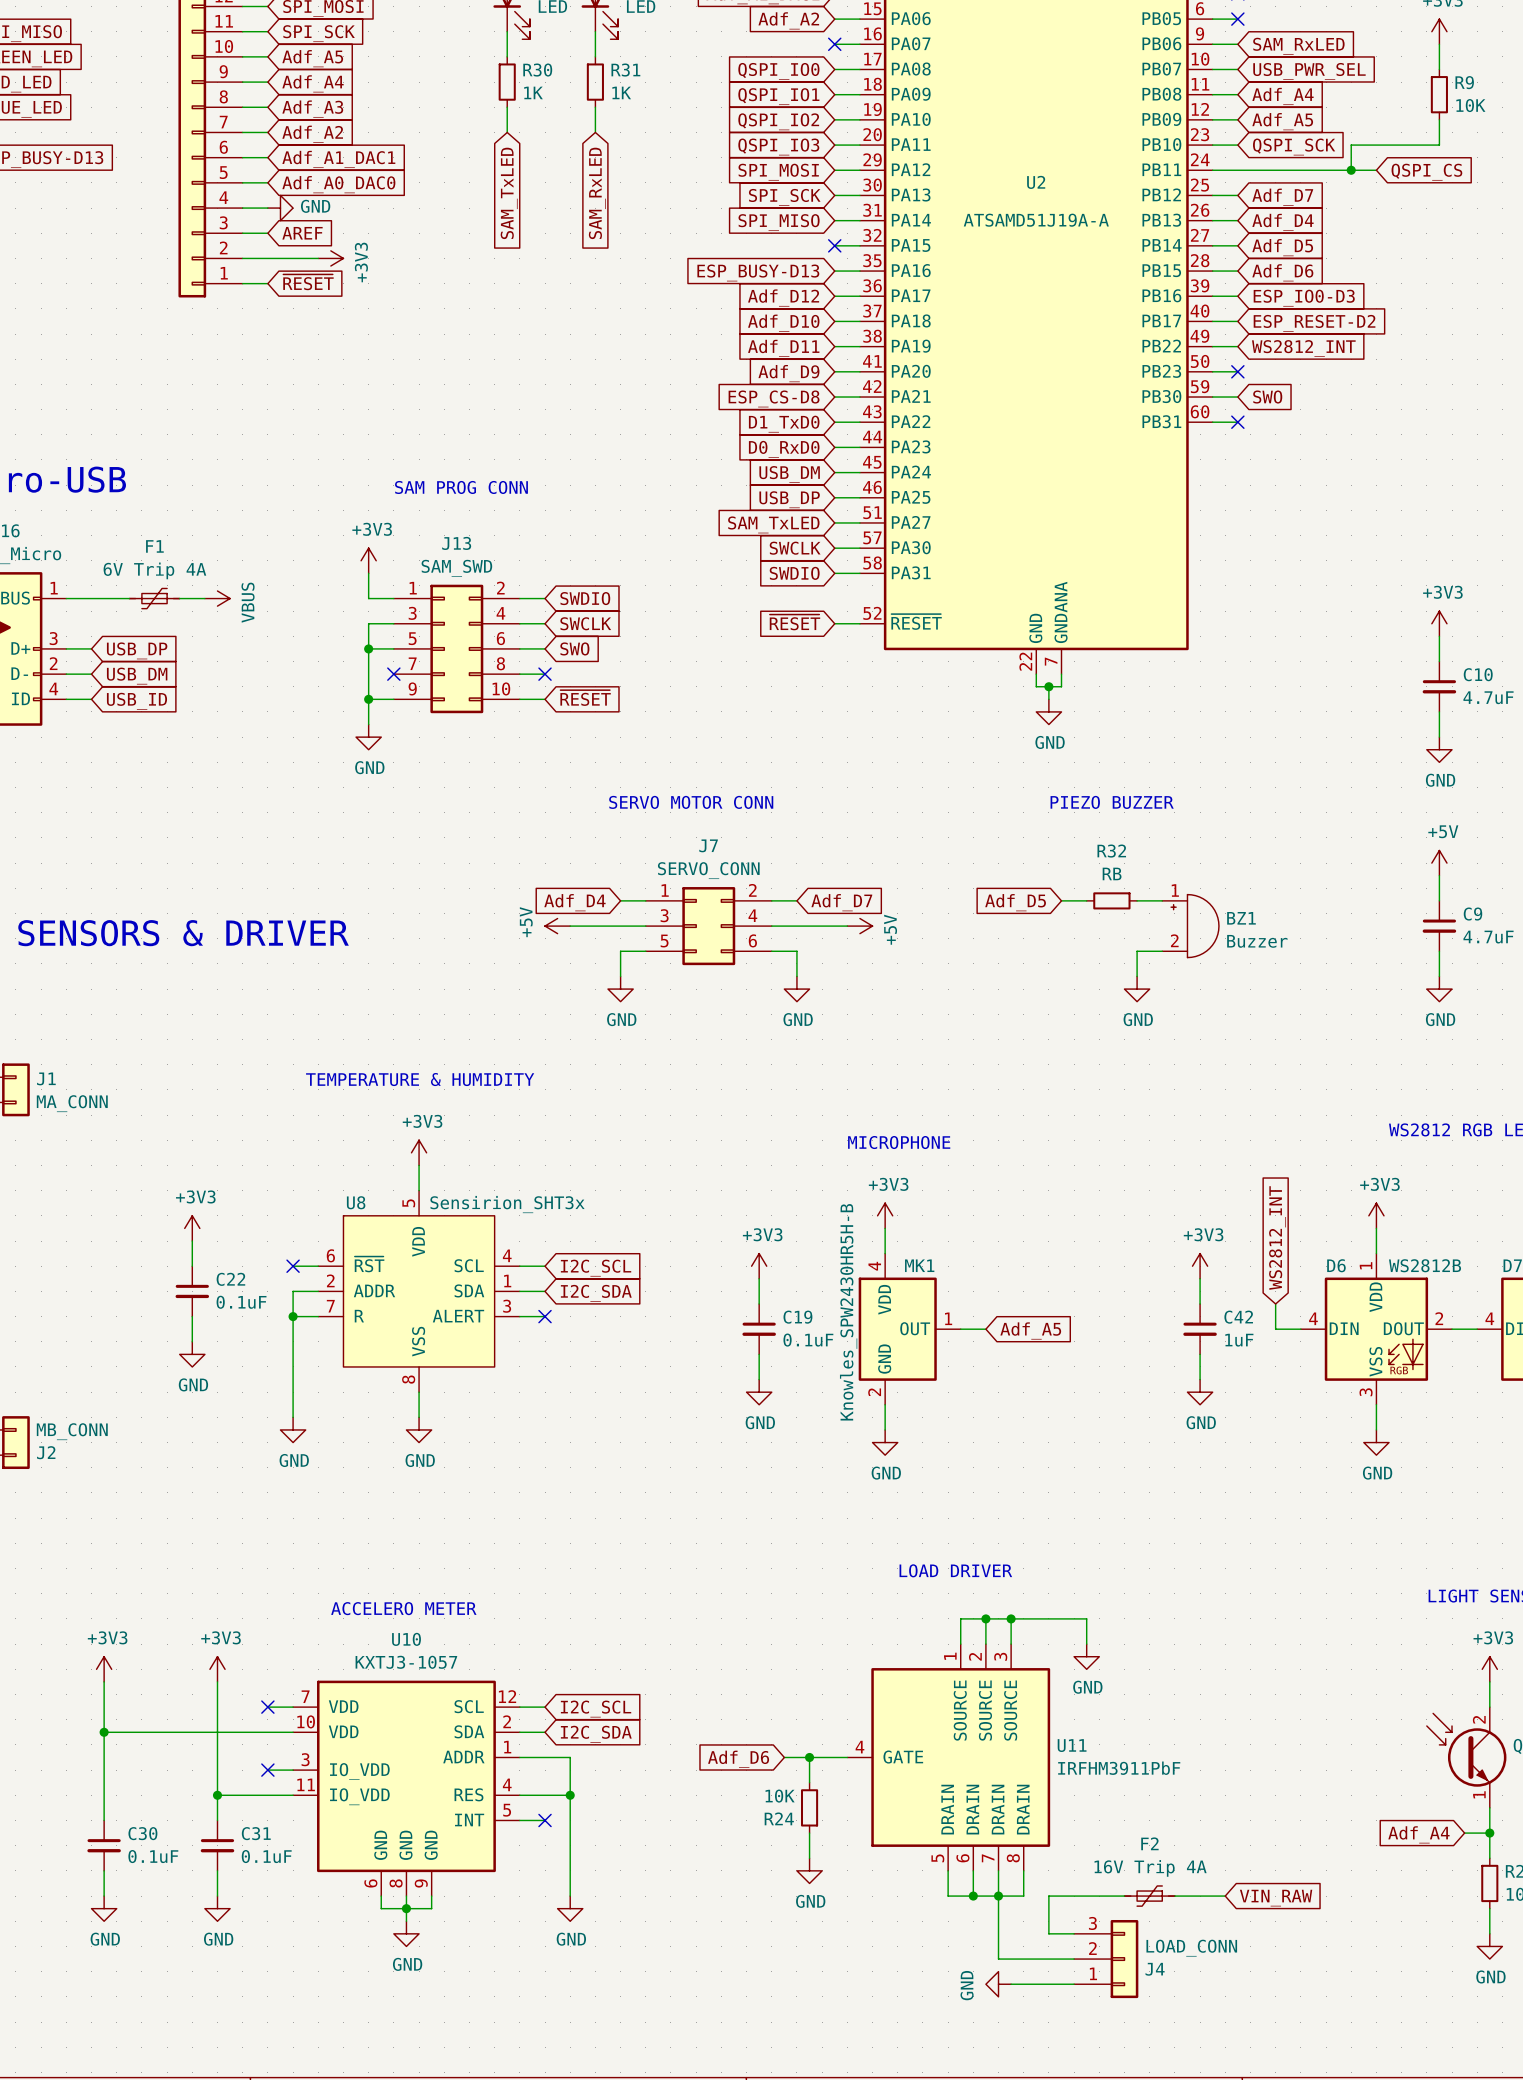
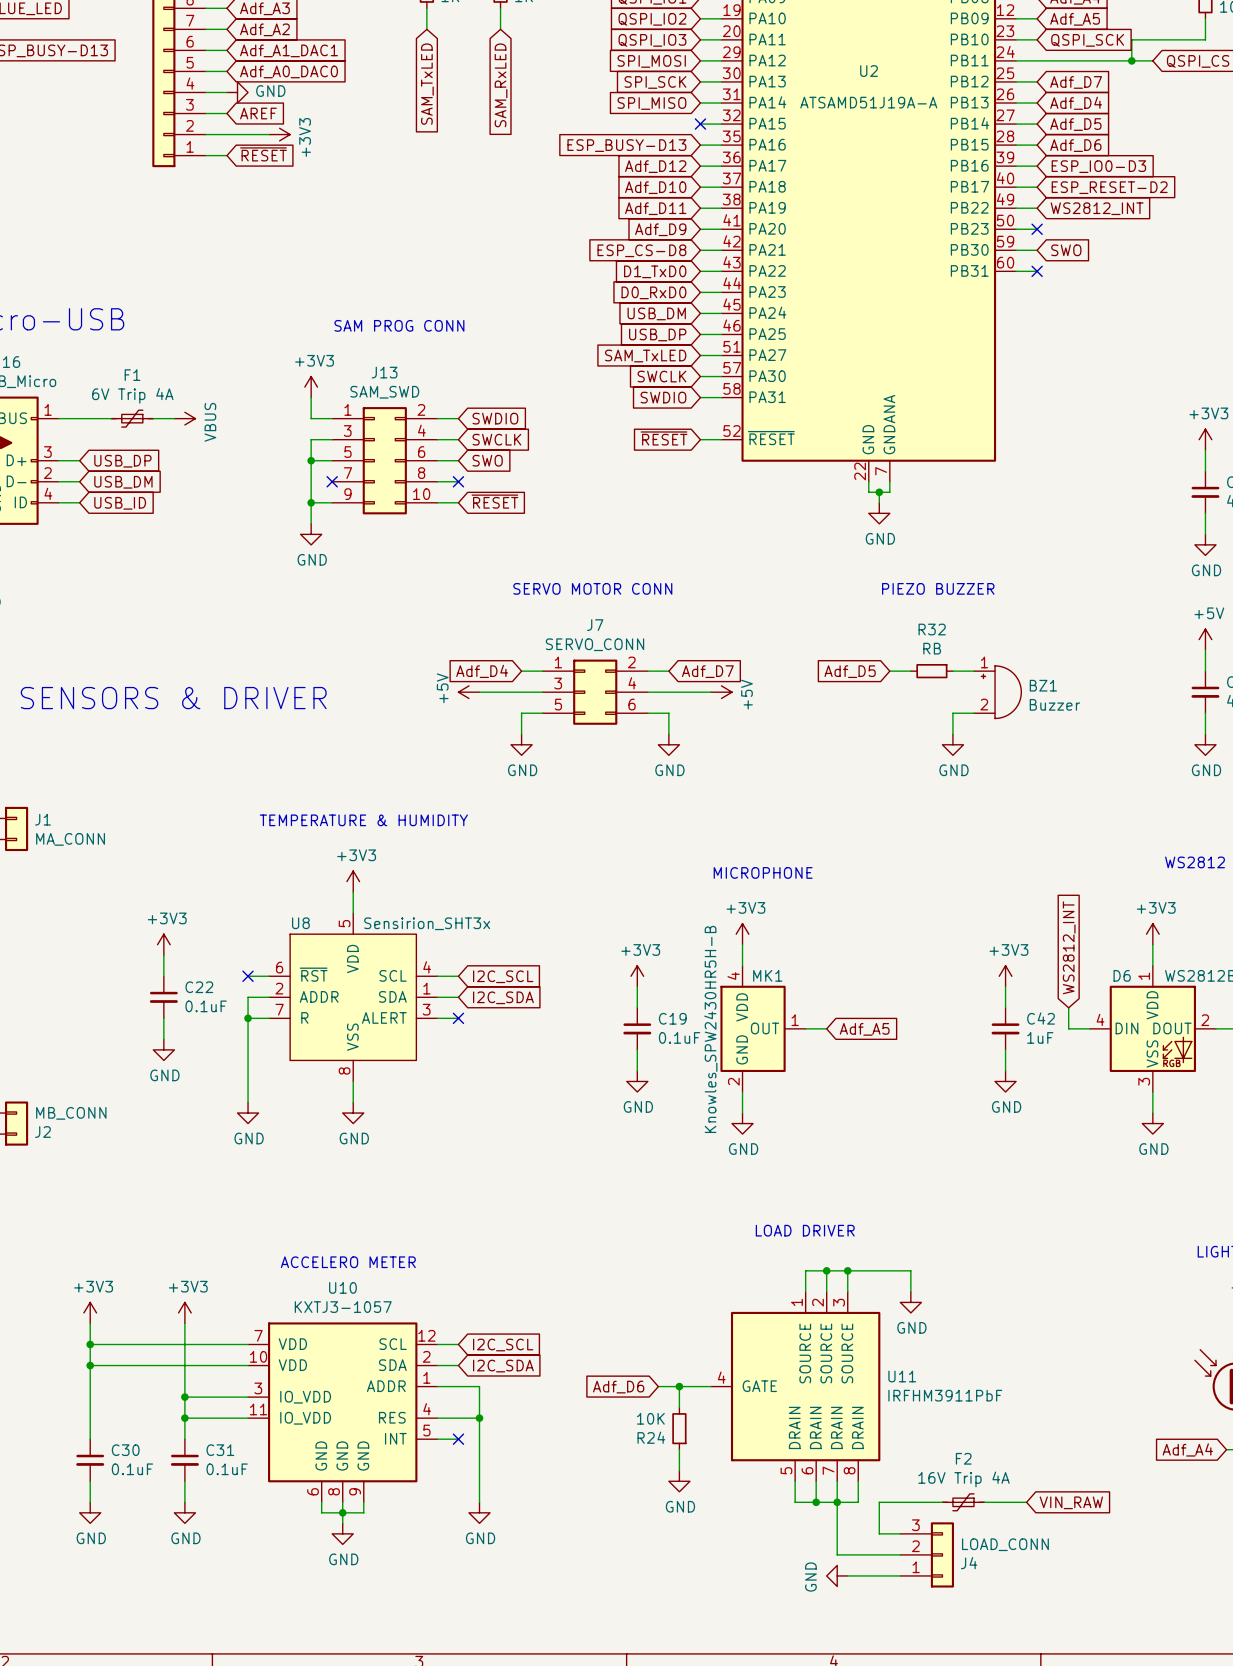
wire: none -> (90, 1344) (226, 1344)
junction: none -> (90, 1344)
no-connect mark: (267, 1707) -> none
wire: none -> (184, 1397) (226, 1397)
junction: none -> (184, 1397)
no-connect mark: (267, 1770) -> none

